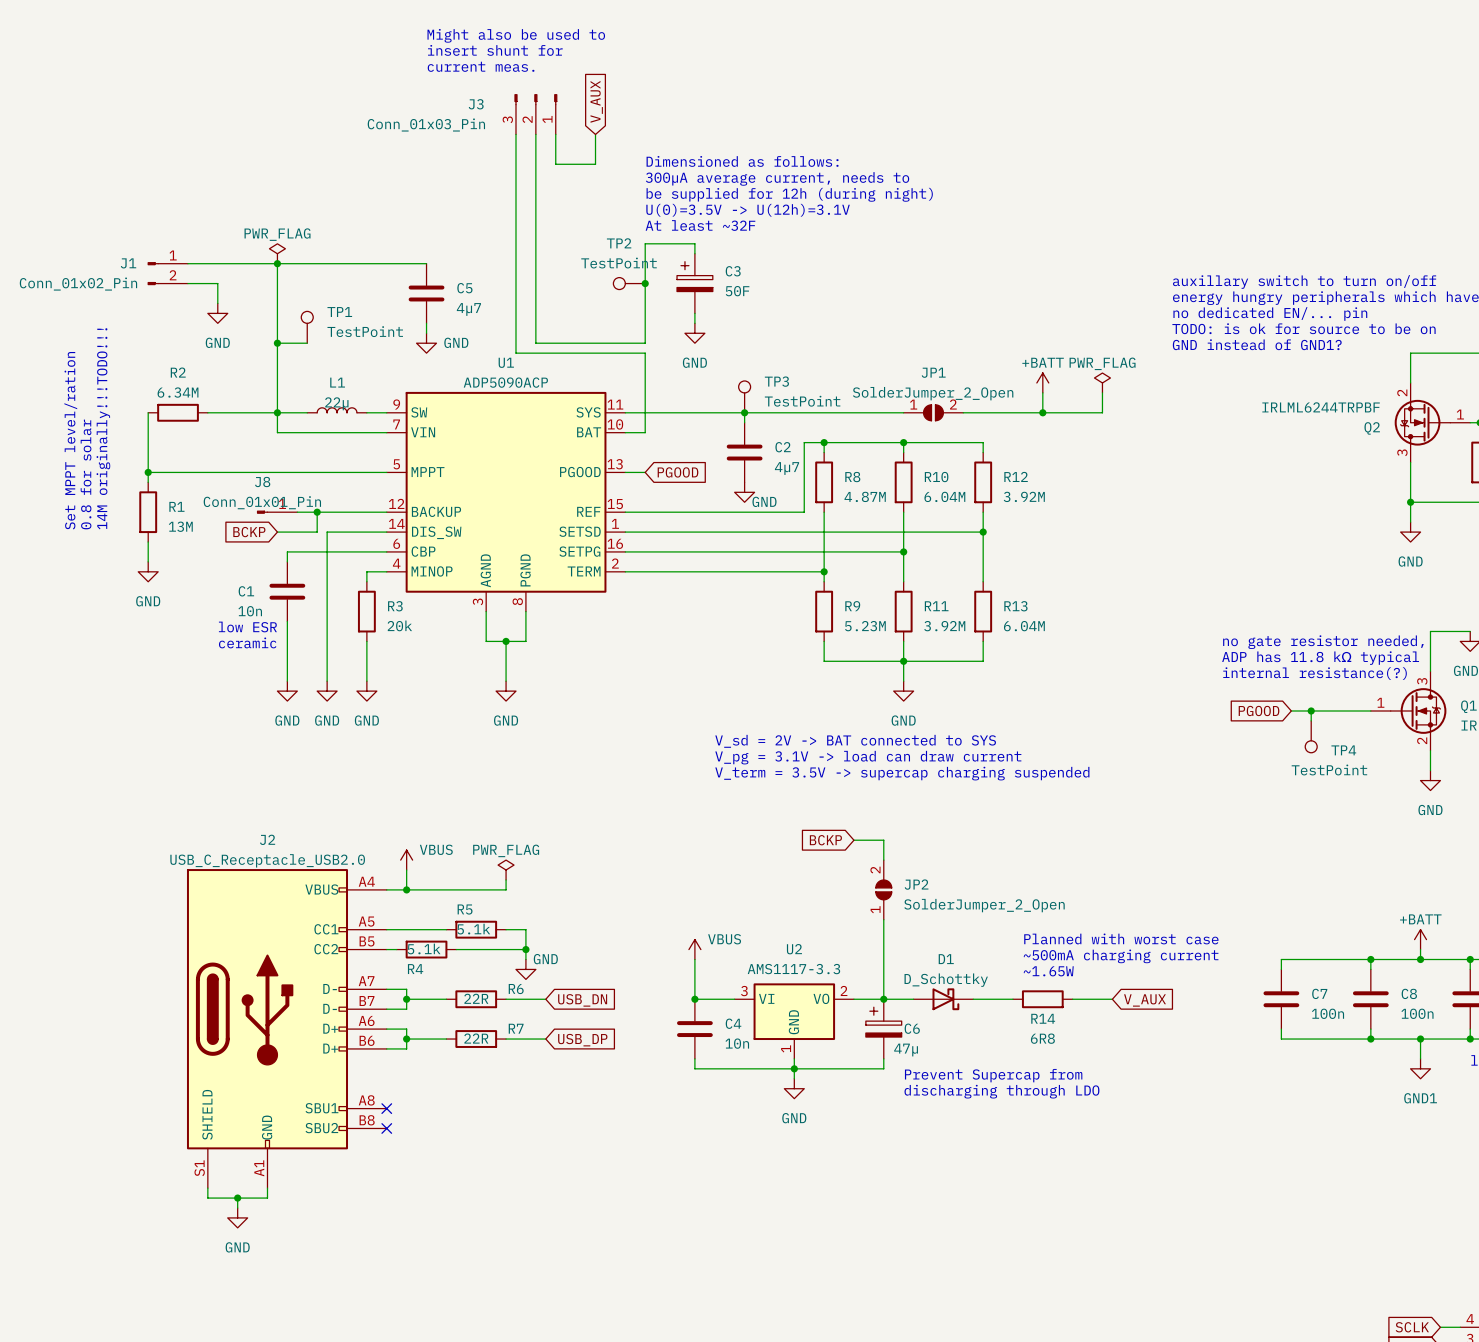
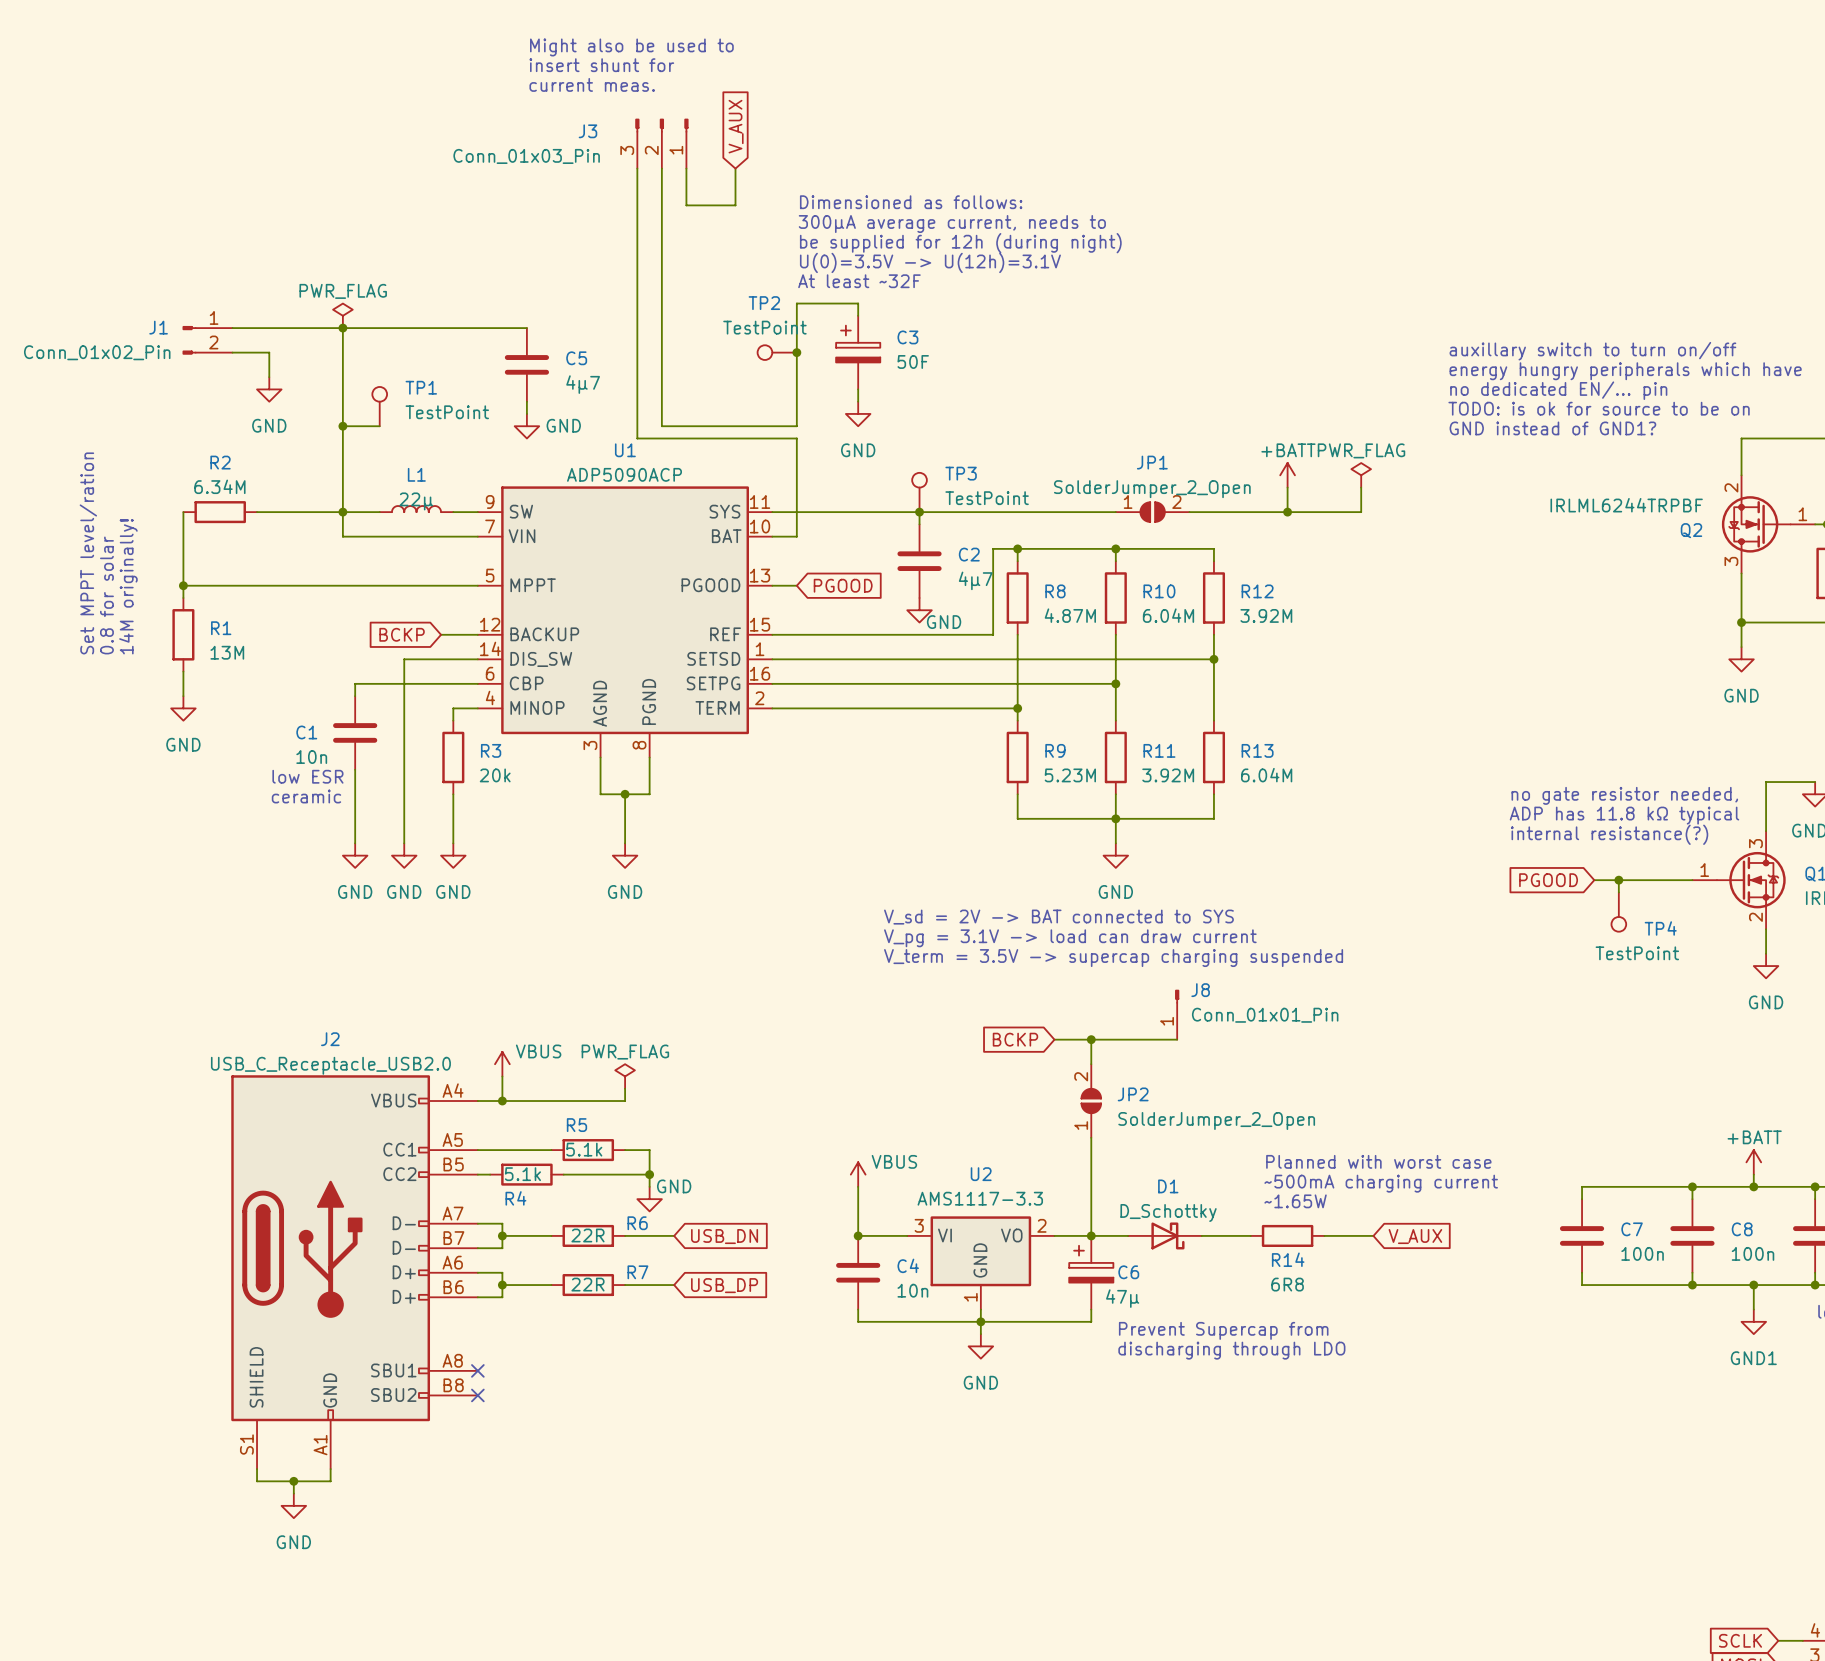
text: 14M originally!!!TODO!!! (103, 428) -> 14M originally! (128, 586)
J8 value position: Conn_01x01_Pin (262, 502) -> Conn_01x01_Pin (1265, 1015)
J8 rotation: 0° (262, 512) -> 90° clockwise (1177, 996)
J8 position: (277, 512) -> (1177, 1014)
wire: (297, 512) (356, 512) -> none
wire: (317, 512) (317, 532) (277, 532) -> none
junction: (317, 512) -> none
global label position: BCKP (249, 532) -> BCKP (402, 634)
wire: none -> (1091, 1039) (1177, 1039)
junction: none -> (1091, 1039)

